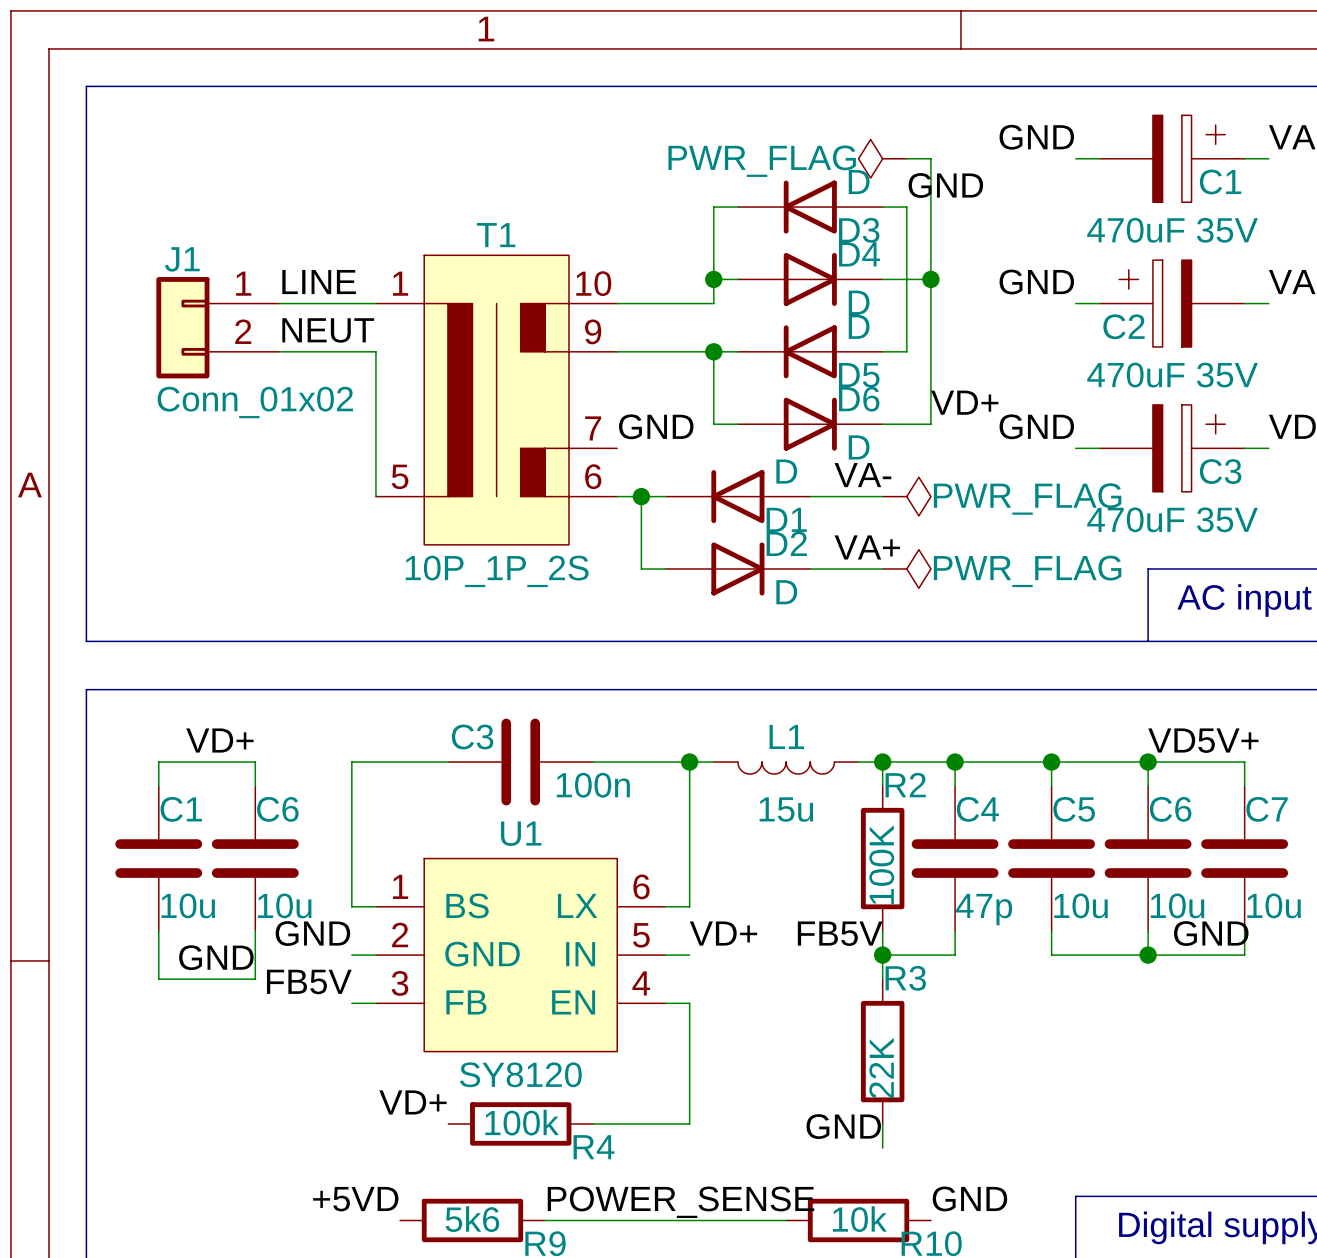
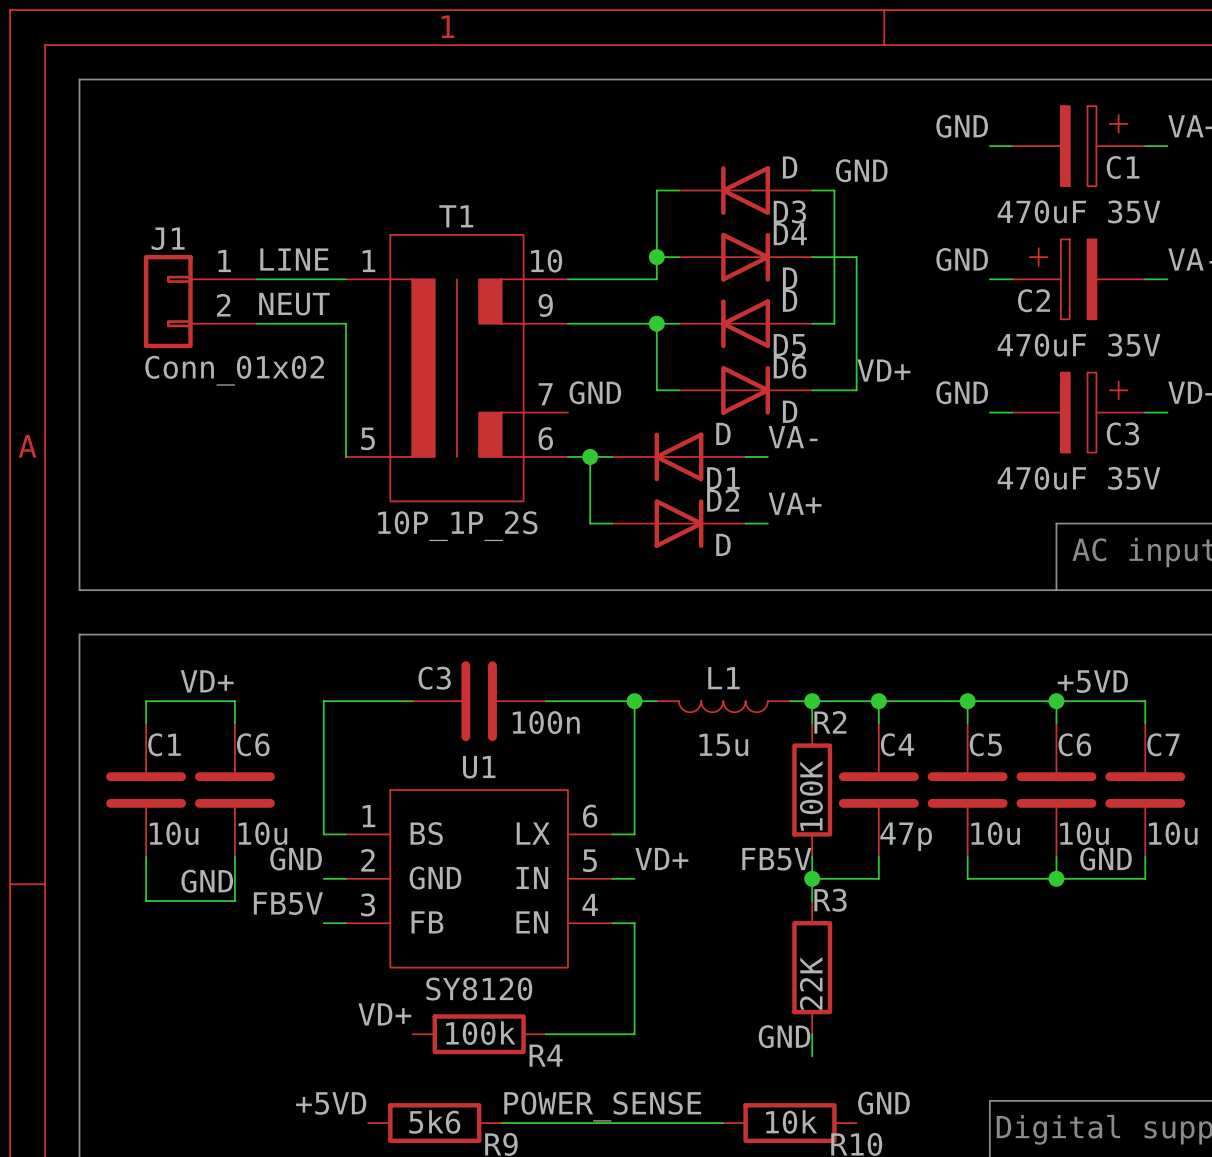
power symbol: PWR_FLAG (882, 158) -> none
wire: (906, 158) (930, 158) (930, 279) -> none
junction: (930, 279) -> none
wire: (834, 496) (882, 496) -> none
power symbol: PWR_FLAG (906, 496) -> none
wire: (834, 568) (882, 568) -> none
power symbol: PWR_FLAG (906, 568) -> none
label: VD5V+ (1203, 740) -> +5VD (1092, 681)

